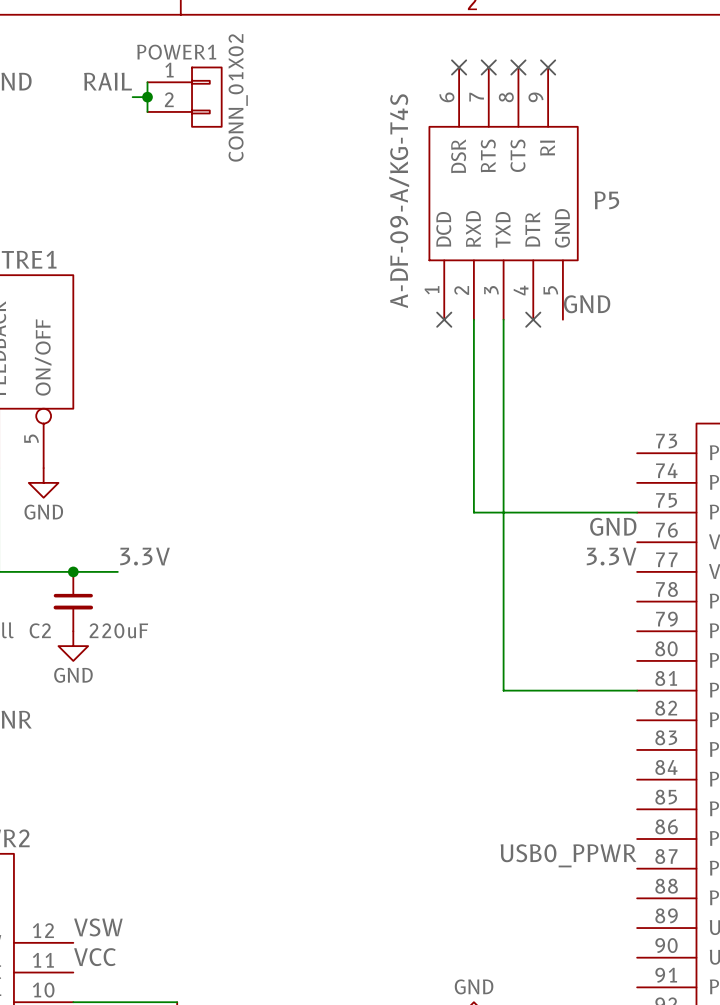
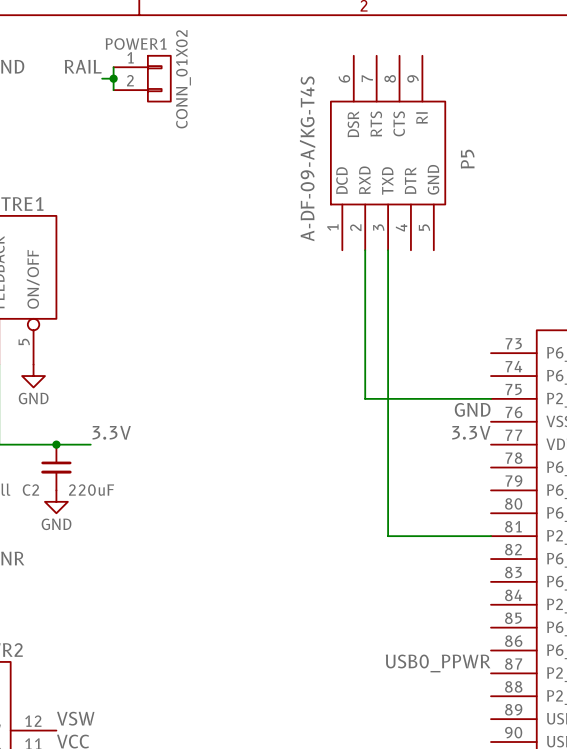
no-connect mark: (459, 67) -> none
no-connect mark: (488, 67) -> none
no-connect mark: (518, 67) -> none
no-connect mark: (548, 67) -> none
P5 name rotation: 0° (606, 200) -> 90° counterclockwise (467, 159)
label: GND (587, 304) -> none
no-connect mark: (444, 319) -> none
no-connect mark: (533, 319) -> none

